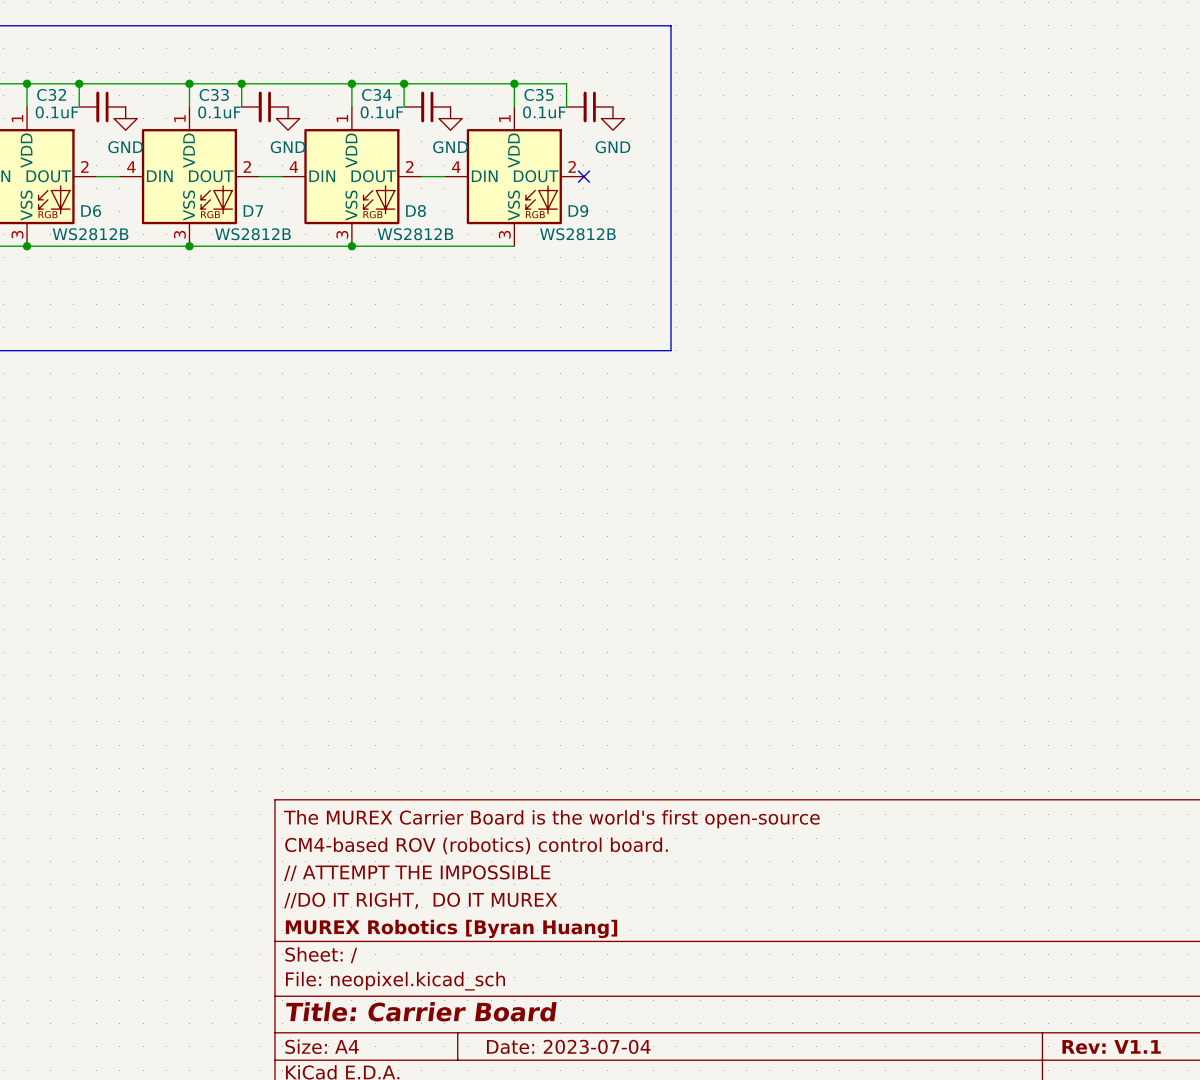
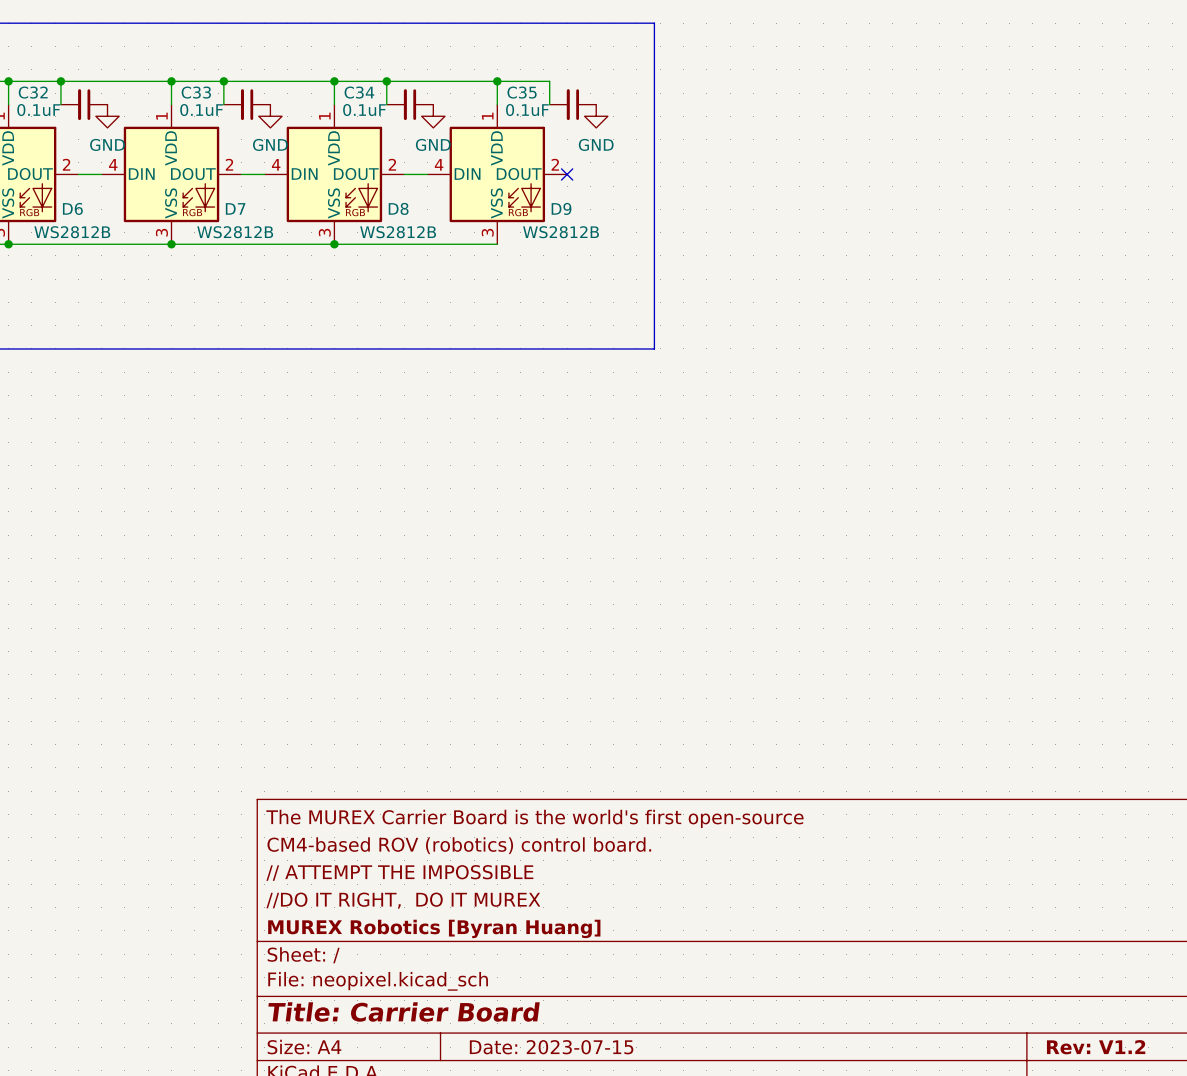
title block: Date: 2023-07-04 (568, 1046) -> Date: 2023-07-15 (551, 1047)
title block: Rev: V1.1 (1111, 1047) -> Rev: V1.2 (1096, 1047)

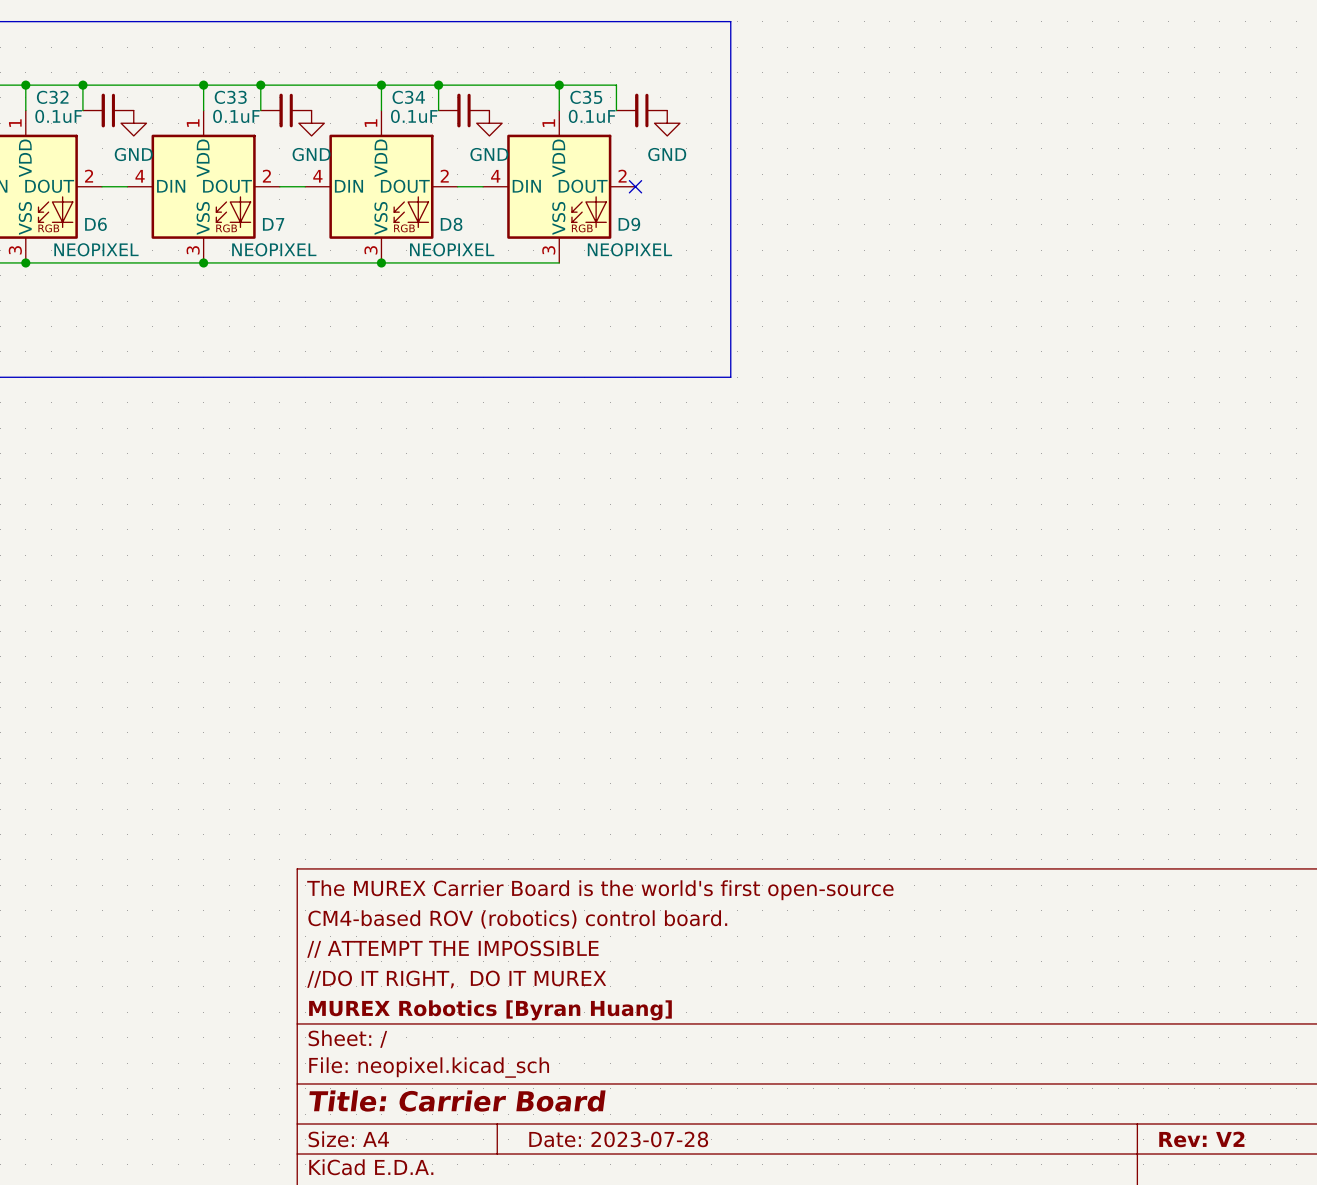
D6 value: WS2812B (72, 232) -> NEOPIXEL (96, 249)
D7 value: WS2812B (235, 232) -> NEOPIXEL (274, 249)
D8 value: WS2812B (398, 232) -> NEOPIXEL (452, 249)
D9 value: WS2812B (561, 232) -> NEOPIXEL (629, 249)
title block: Date: 2023-07-15 (551, 1047) -> Date: 2023-07-28 (618, 1139)
title block: Rev: V1.2 (1096, 1047) -> Rev: V2 (1201, 1139)

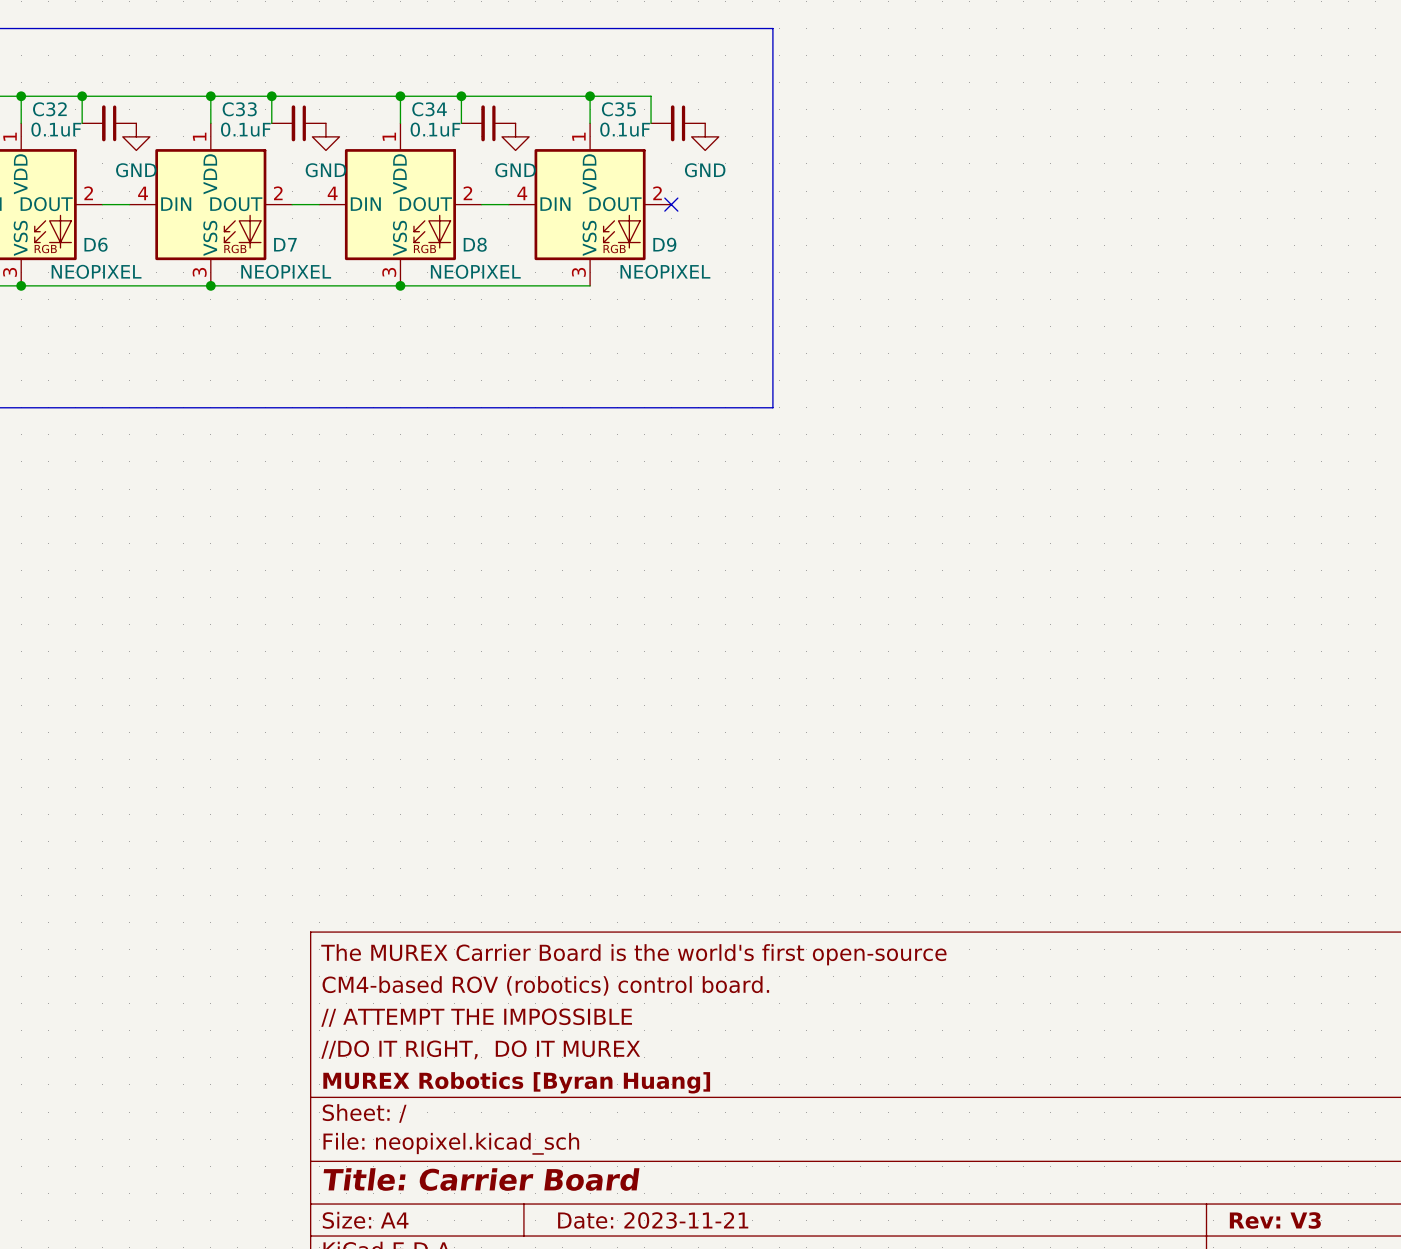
title block: Date: 2023-07-28 (618, 1139) -> Date: 2023-11-21 (653, 1220)
title block: Rev: V2 (1201, 1139) -> Rev: V3 (1275, 1220)

